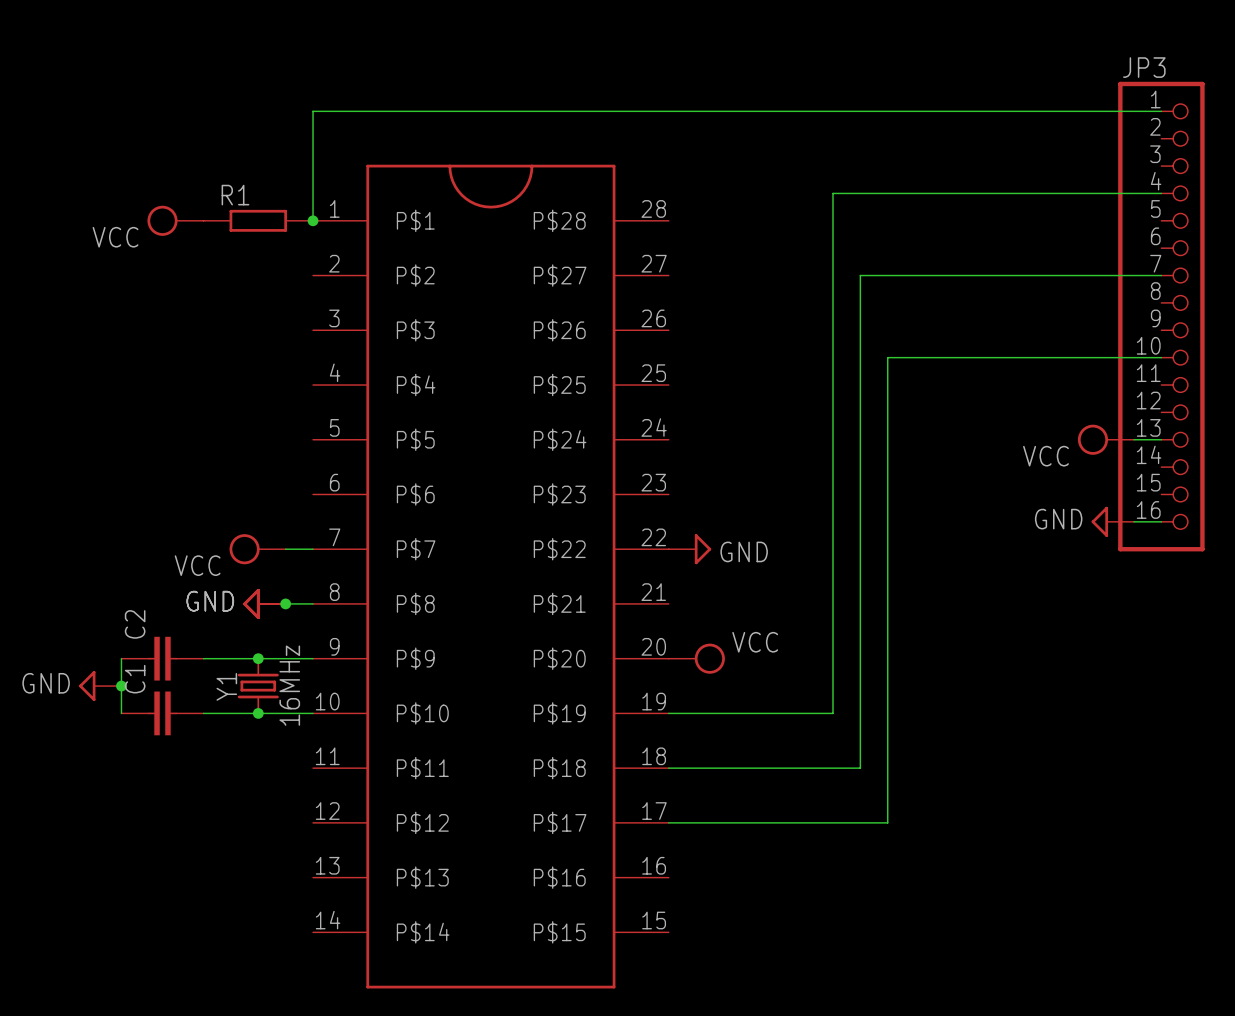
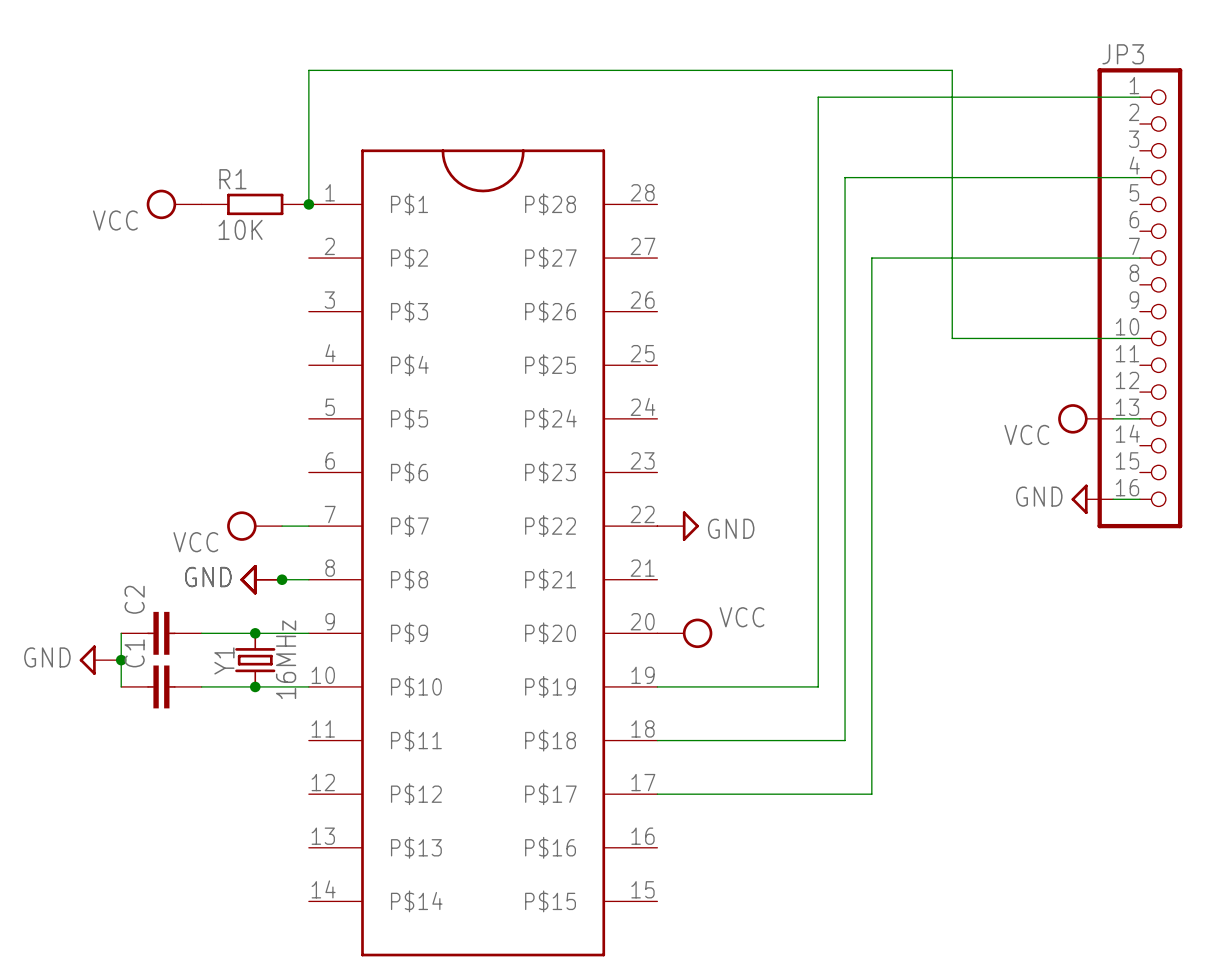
wire: (313, 111) (832, 111) -> (308, 97) (308, 70) (952, 70) (952, 338)
wire: (832, 193) (860, 193) -> (818, 177) (818, 97)
R1 value: none -> 10K (240, 229)
wire: (860, 275) (887, 275) -> (845, 258) (845, 177)
wire: (887, 357) (969, 357) -> (871, 338) (871, 258)

